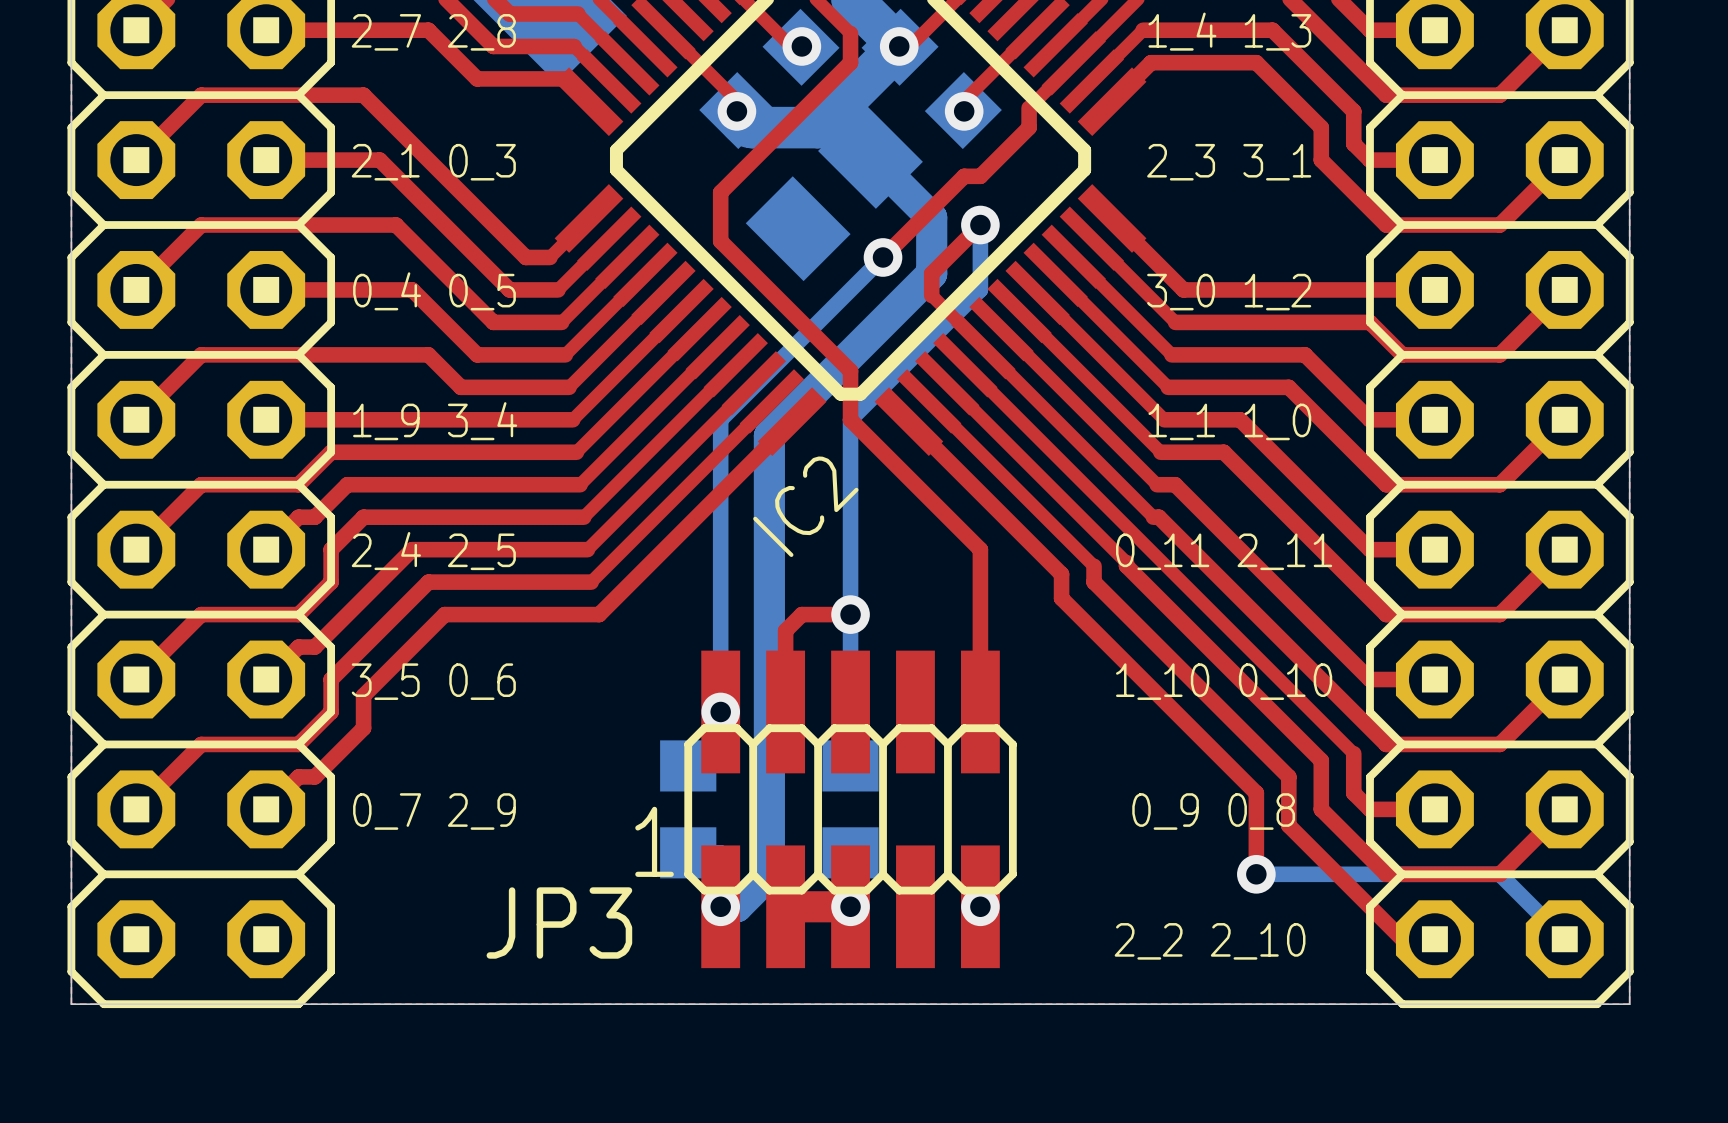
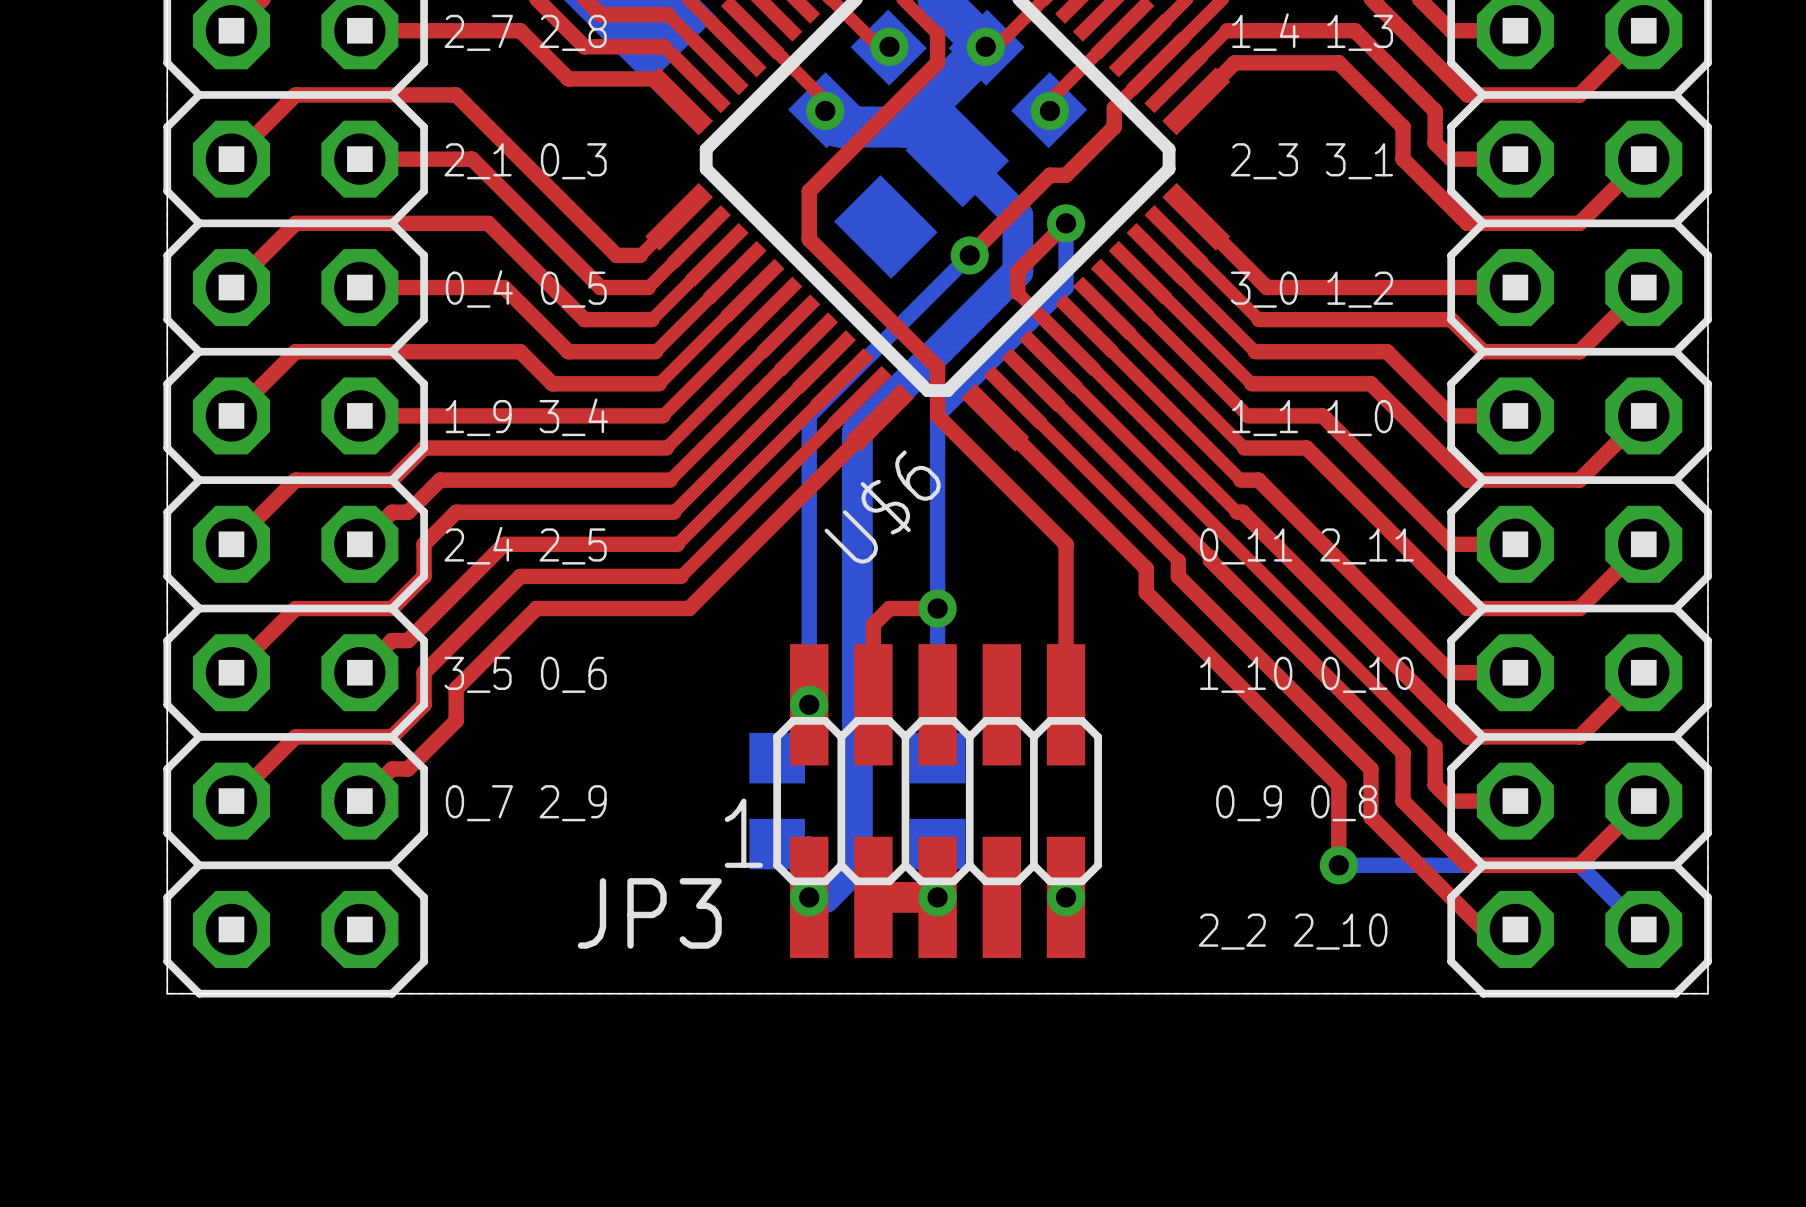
IC2 name: IC2 (805, 506) -> U$6 (882, 507)

